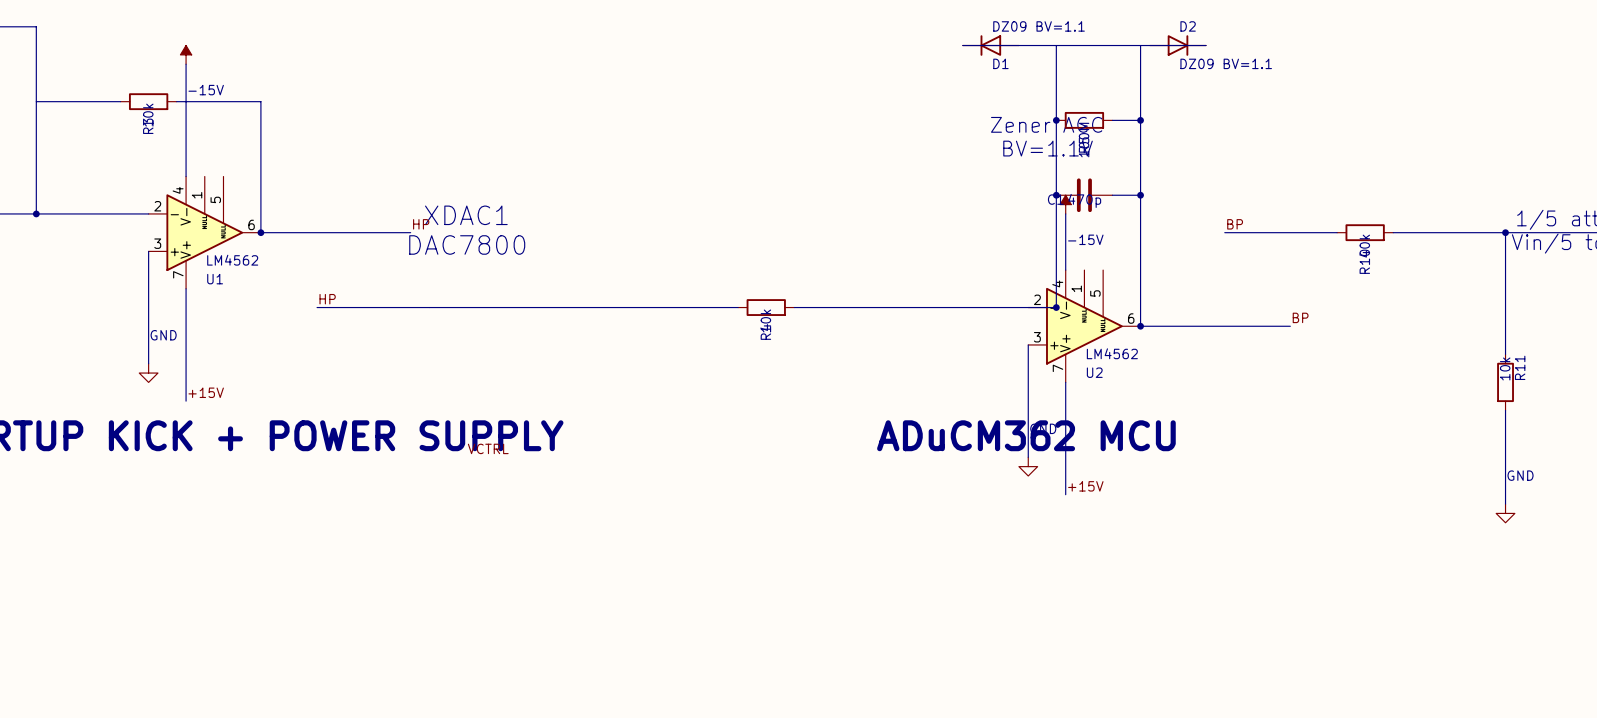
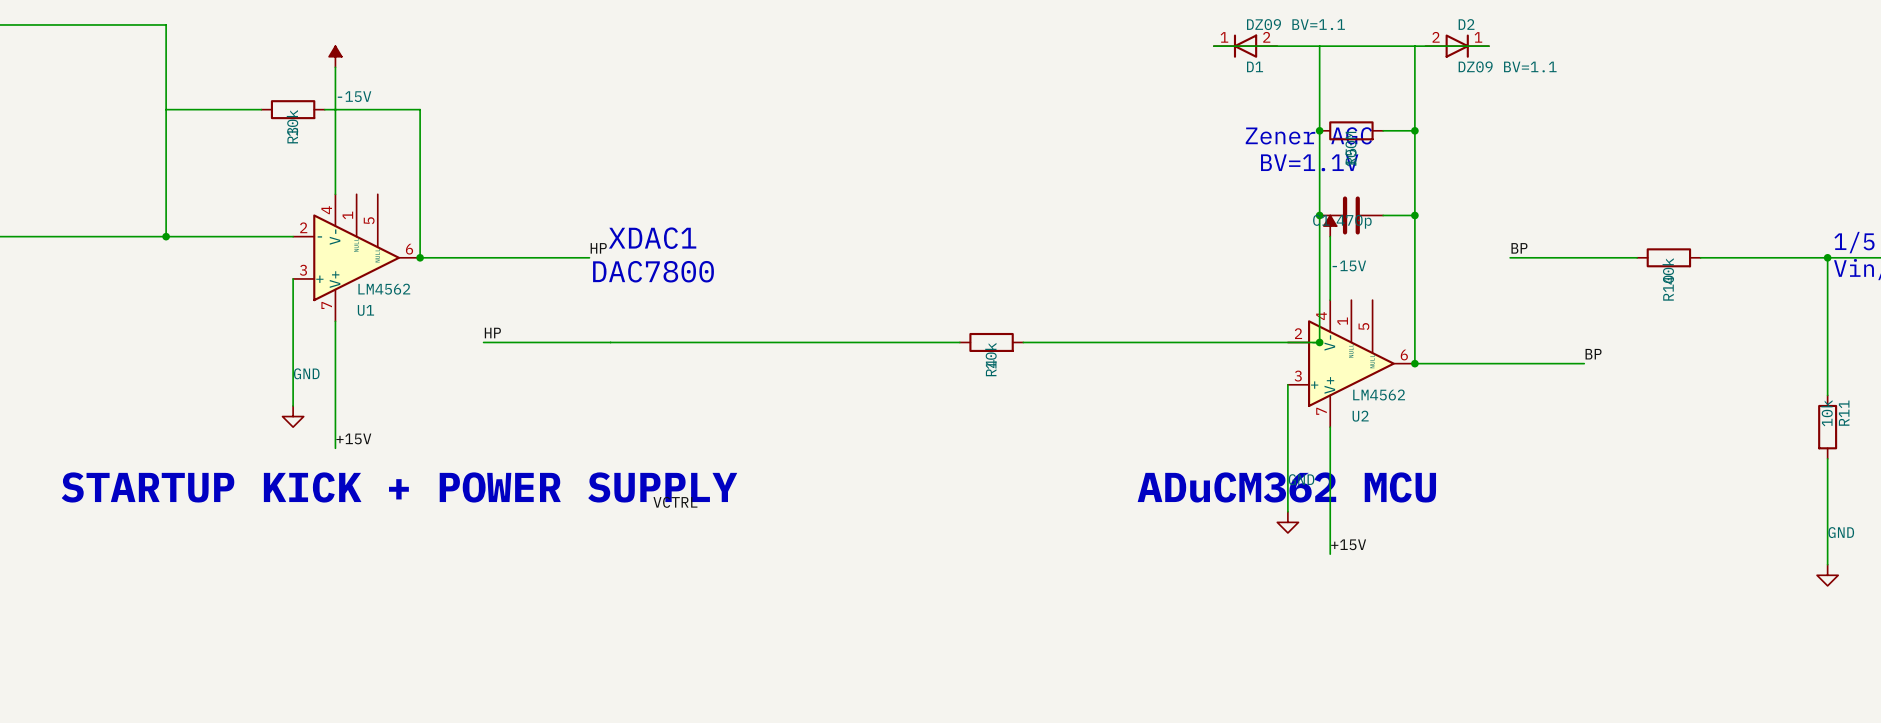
D1 pin number: none -> 1 (1224, 37)
D1 pin number: none -> 2 (1266, 37)
D2 pin number: none -> 2 (1436, 37)
D2 pin number: none -> 1 (1478, 37)

